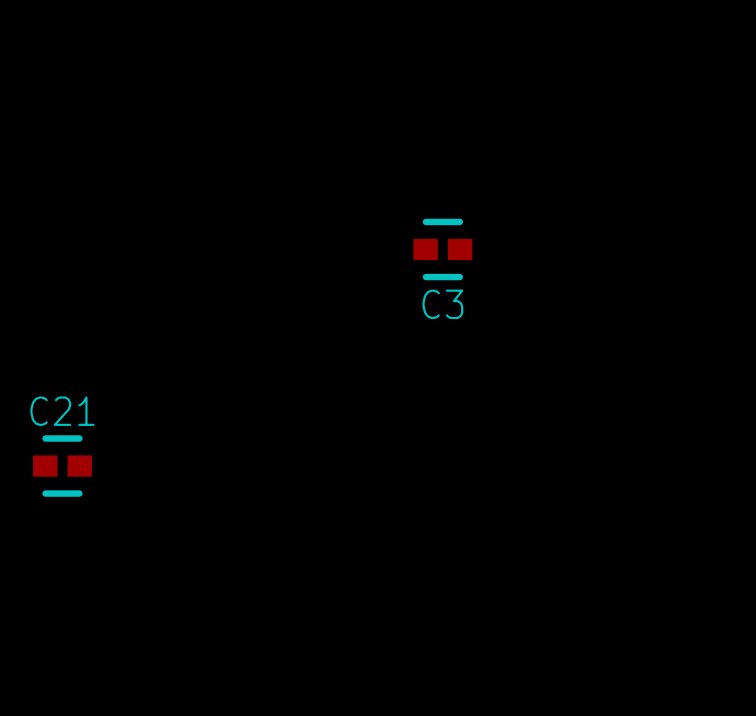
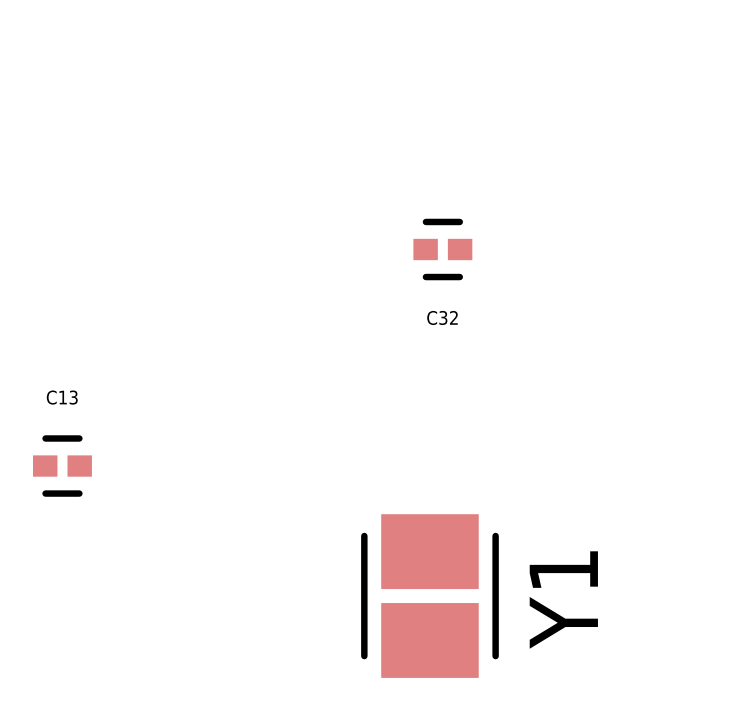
C3 name: C3 (442, 304) -> C32 (442, 317)
C21 name: C21 (62, 411) -> C13 (62, 397)
Y1: none -> (429, 596)

